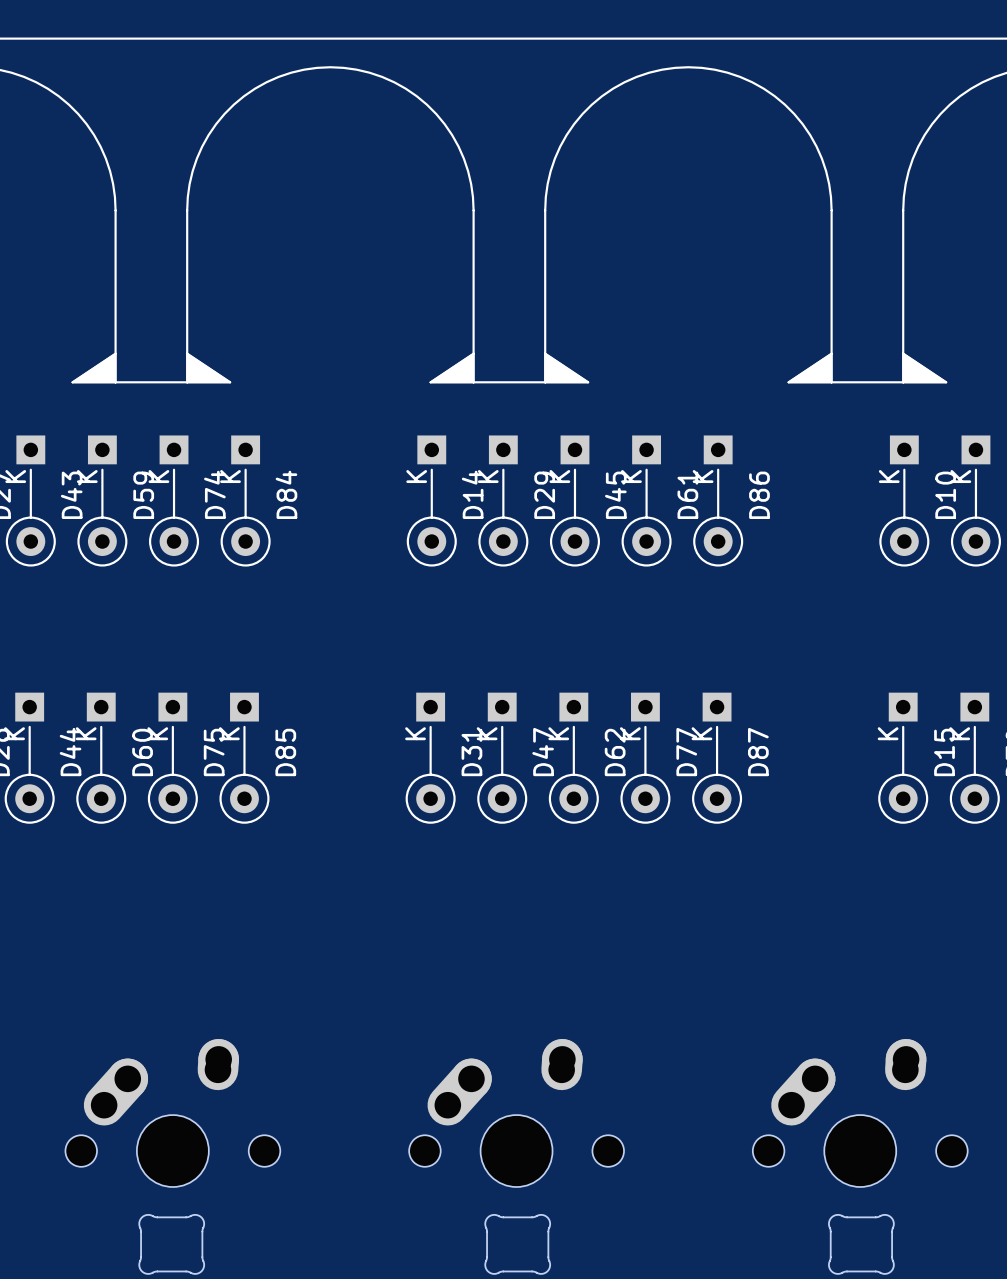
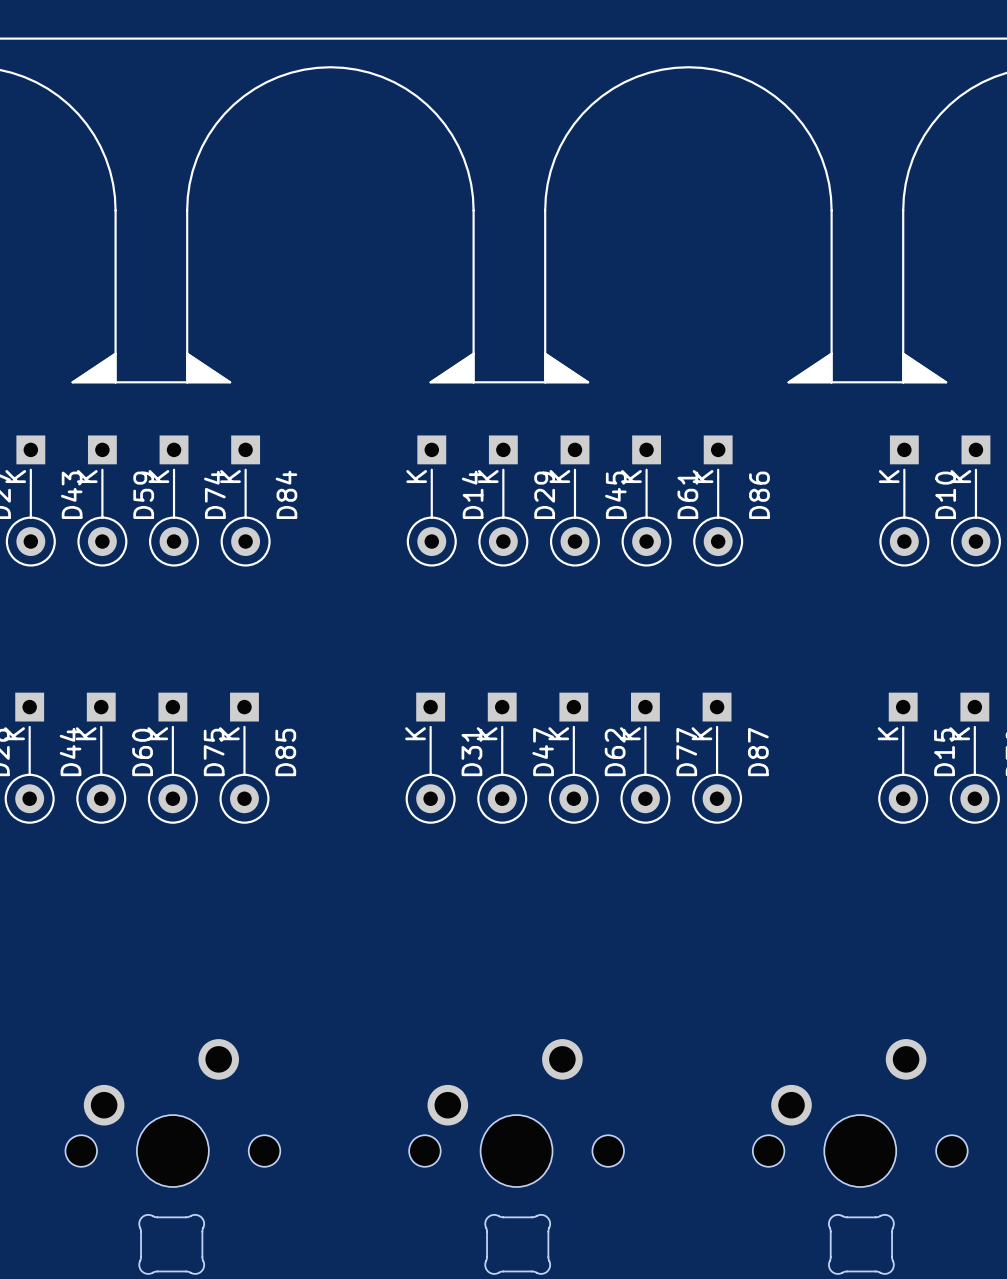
part footprint: [65, 1039, 281, 1188] -> [65, 1039, 281, 1188]
part footprint: [409, 1039, 625, 1188] -> [409, 1039, 625, 1188]
part footprint: [752, 1039, 968, 1188] -> [752, 1039, 968, 1188]

